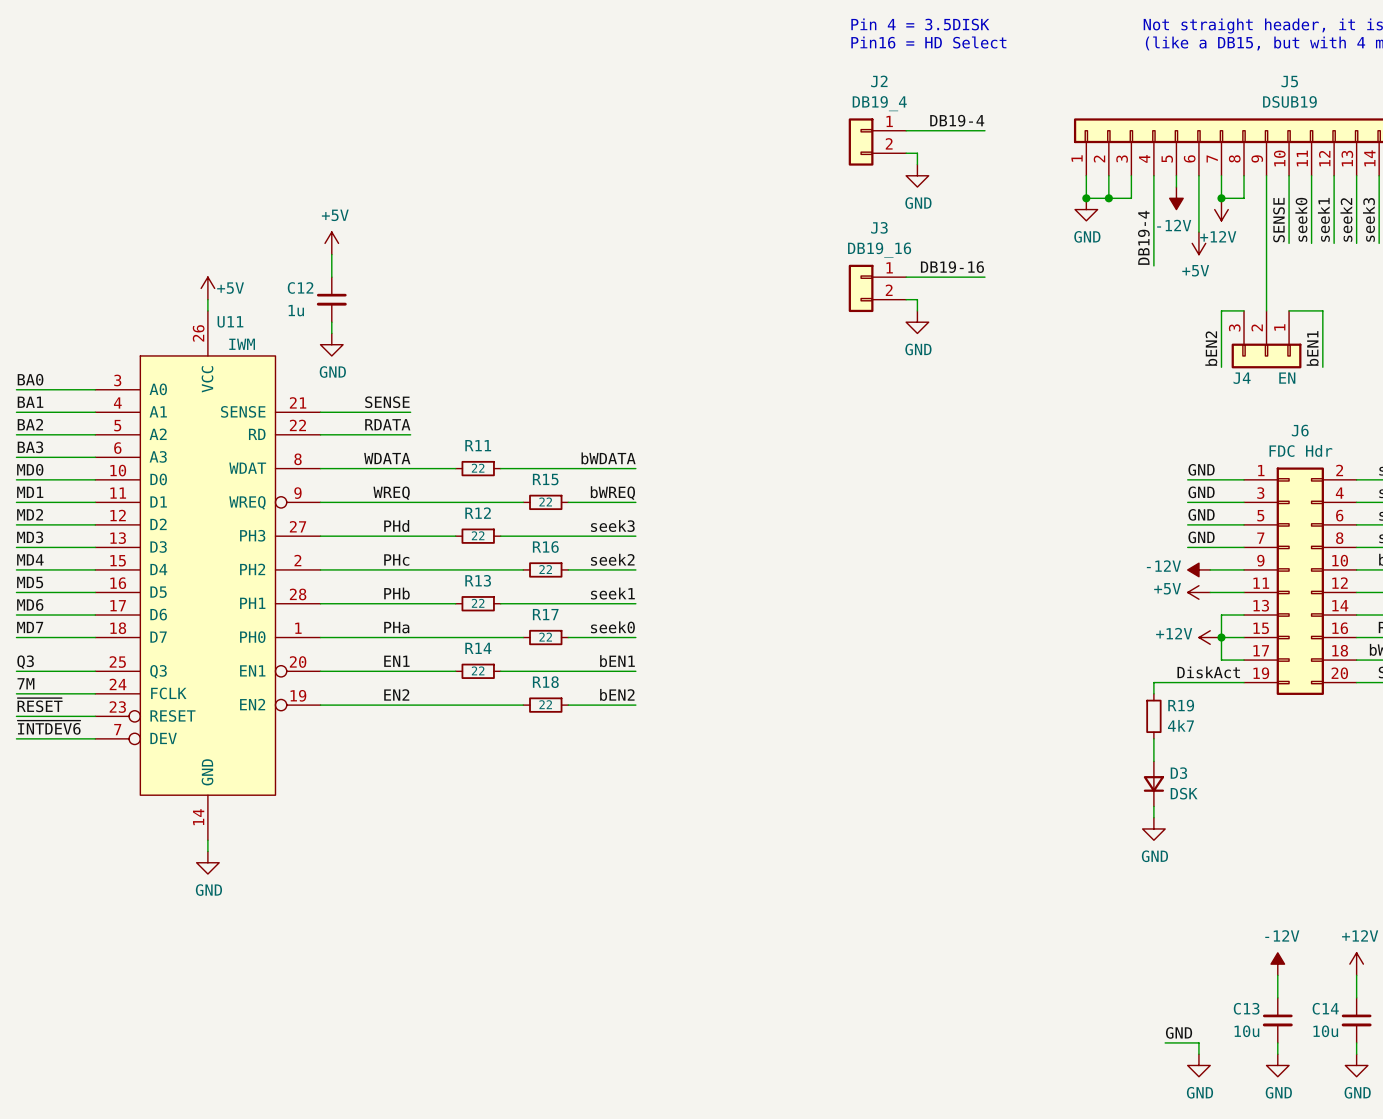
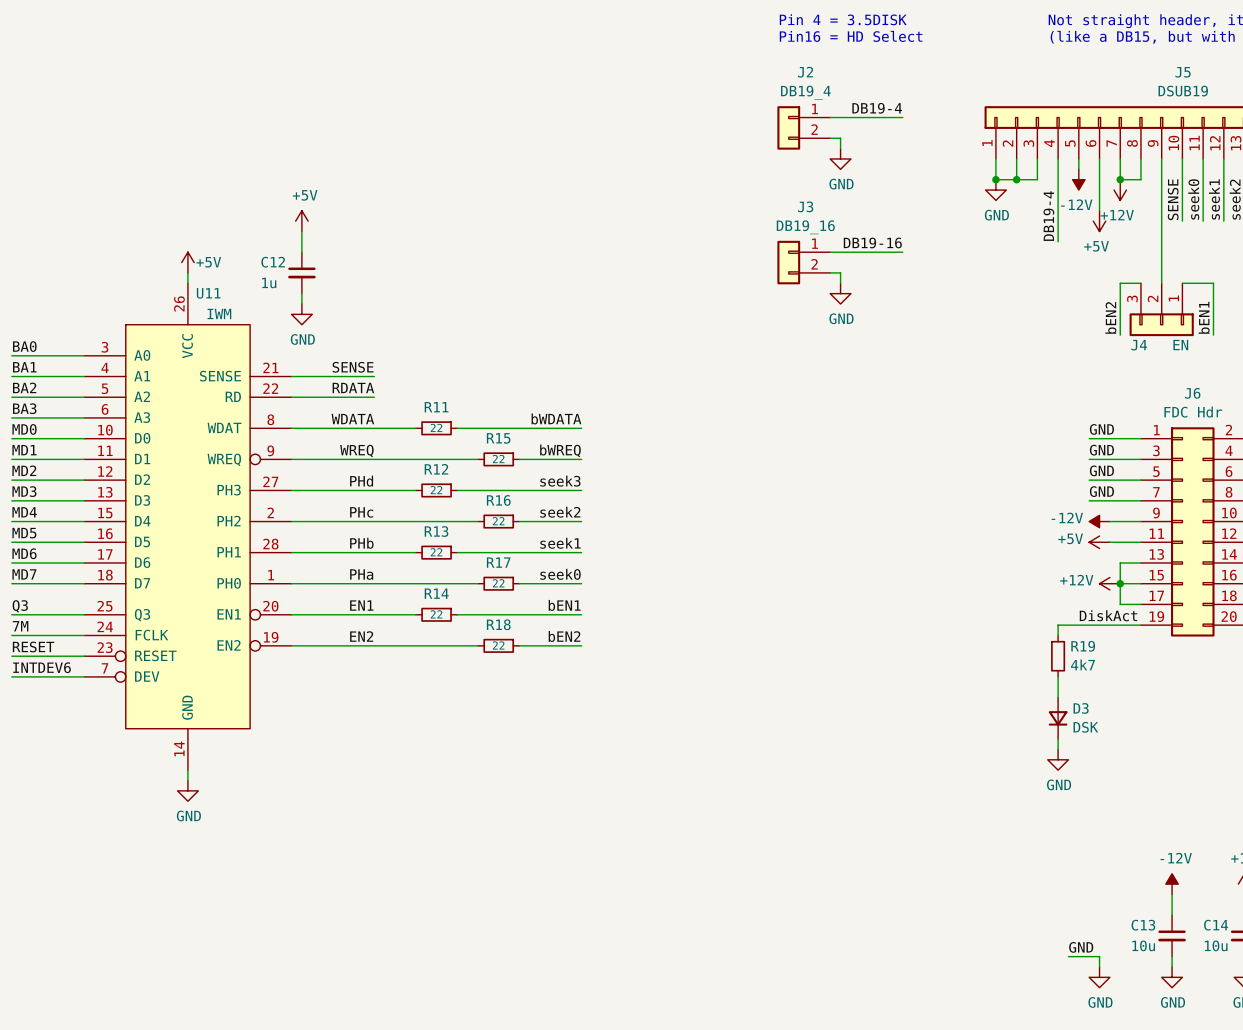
label: ~{RESET} (40, 705) -> RESET (33, 646)
label: ~{INTDEV6} (49, 727) -> INTDEV6 (42, 667)

